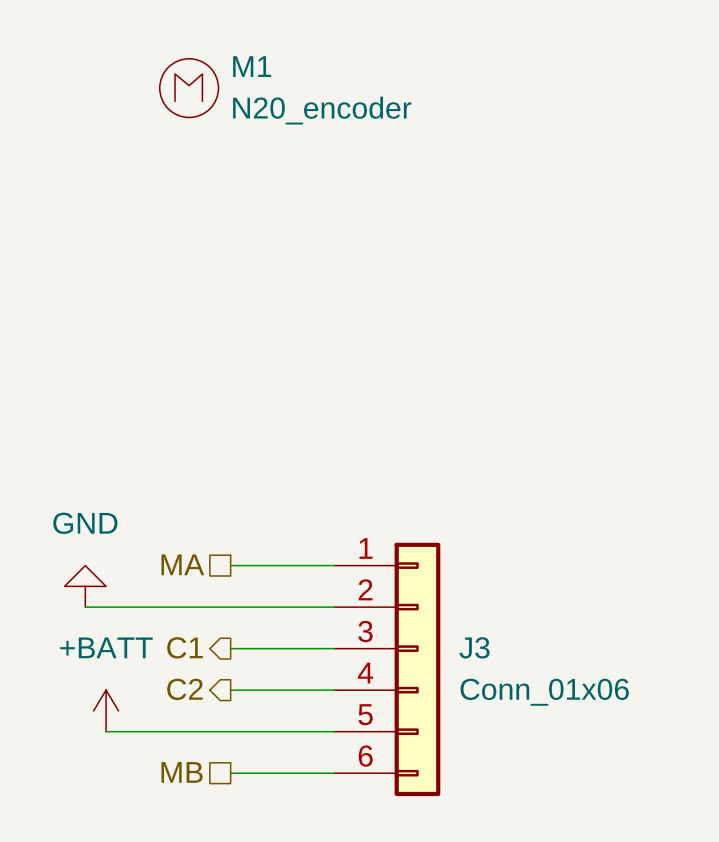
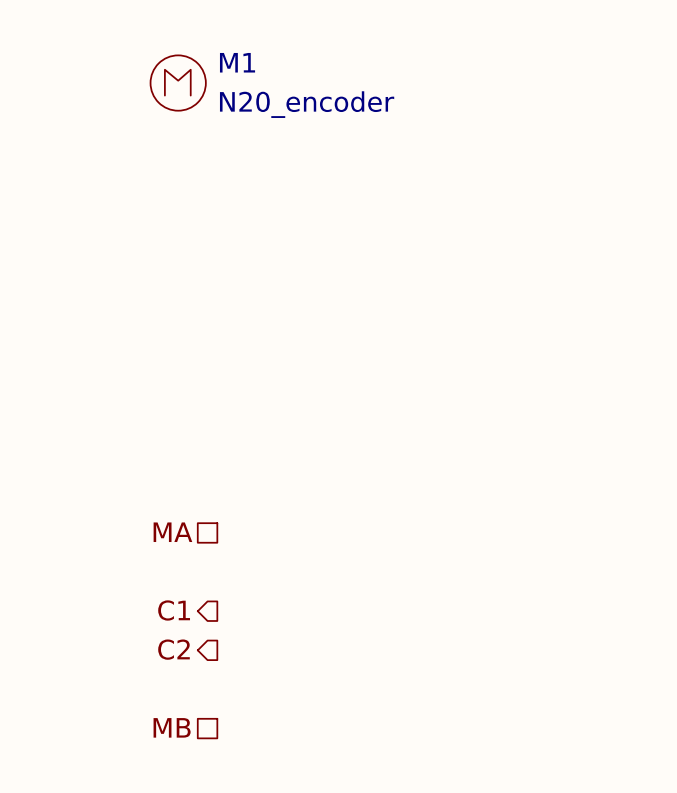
wire: (230, 565) (334, 565) -> none
power symbol: GND (85, 586) -> none
wire: (85, 607) (334, 607) -> none
wire: (230, 648) (334, 648) -> none
J3: Conn_01x06 (387, 669) -> none
wire: (230, 690) (334, 690) -> none
power symbol: +BATT (106, 710) -> none
wire: (106, 731) (334, 731) -> none
wire: (230, 773) (334, 773) -> none

